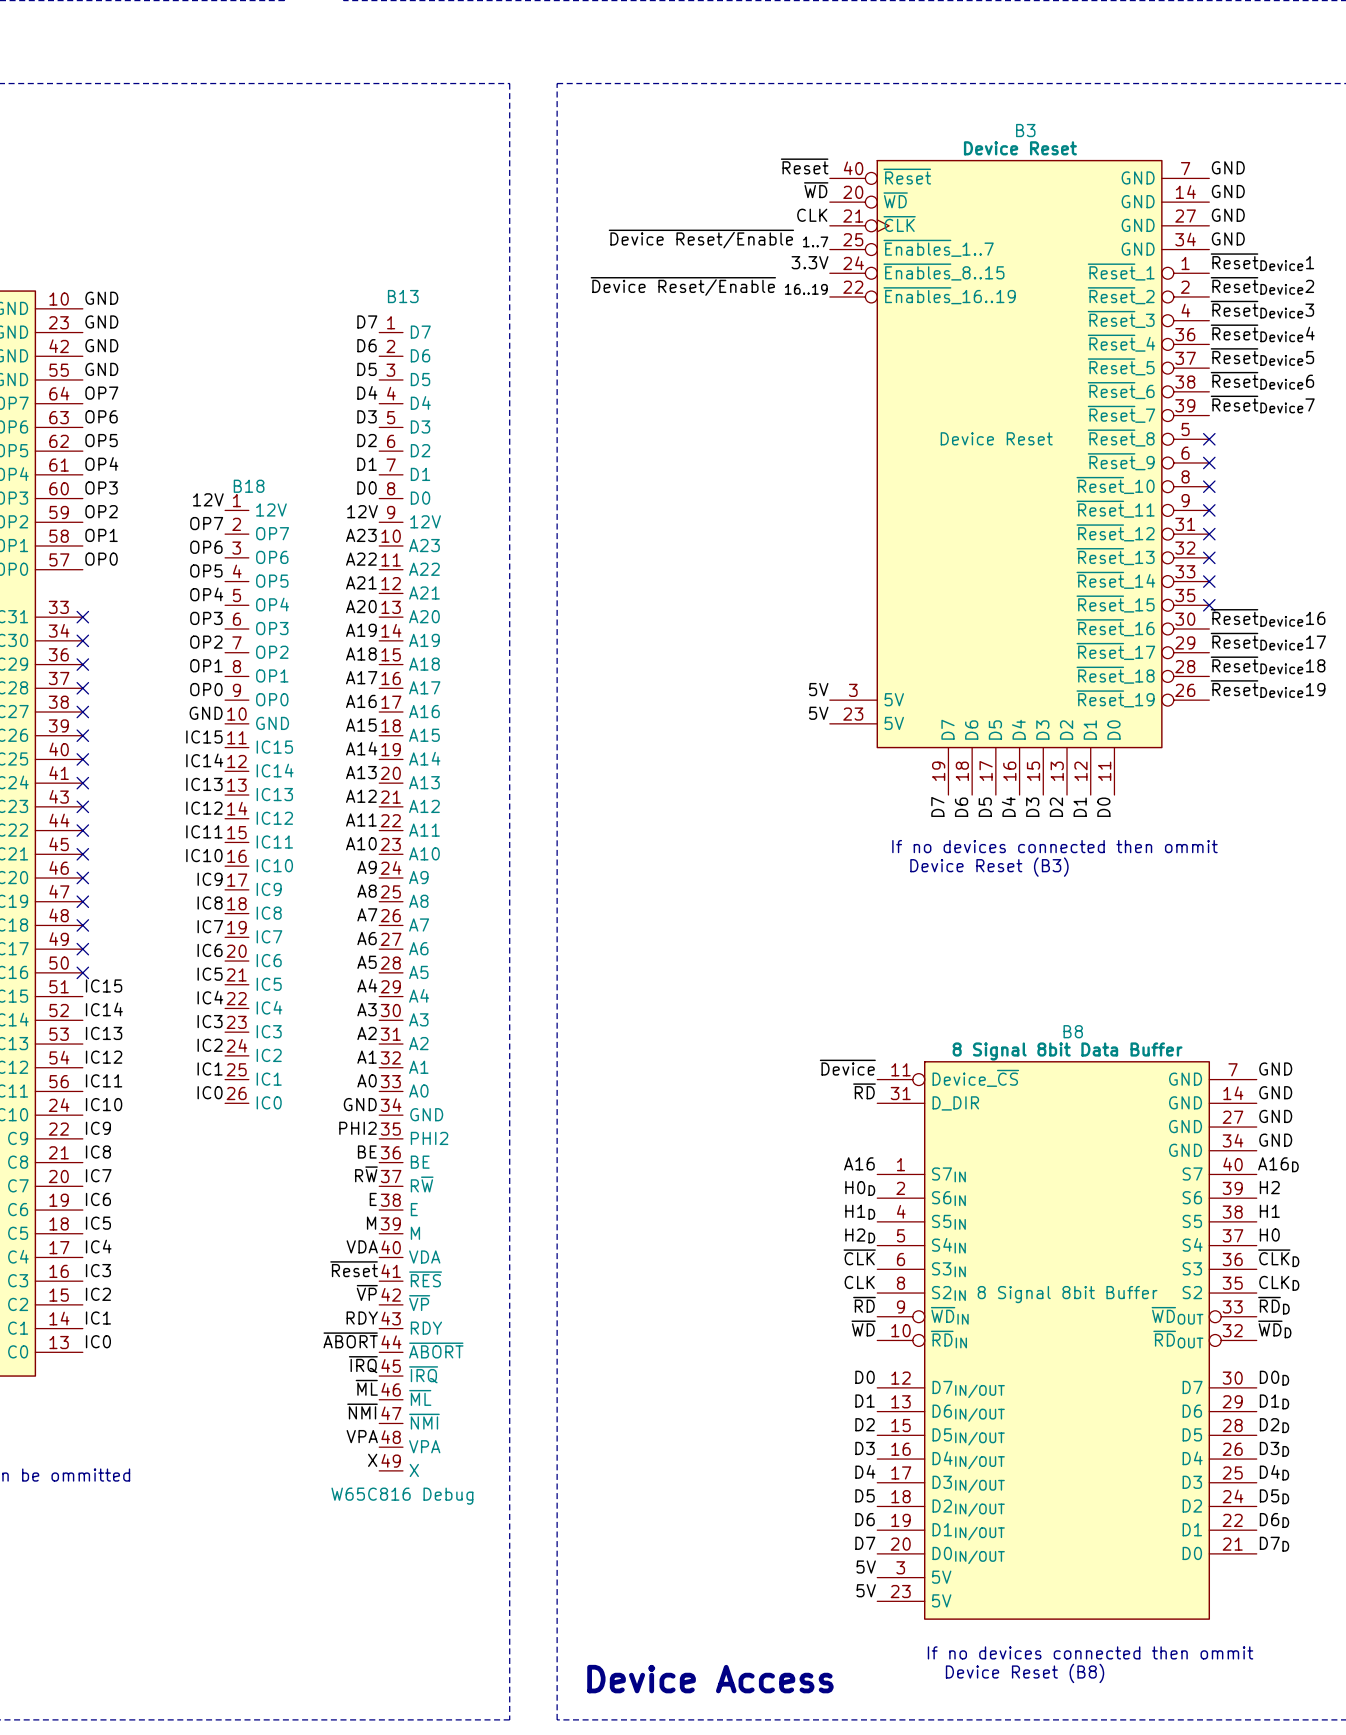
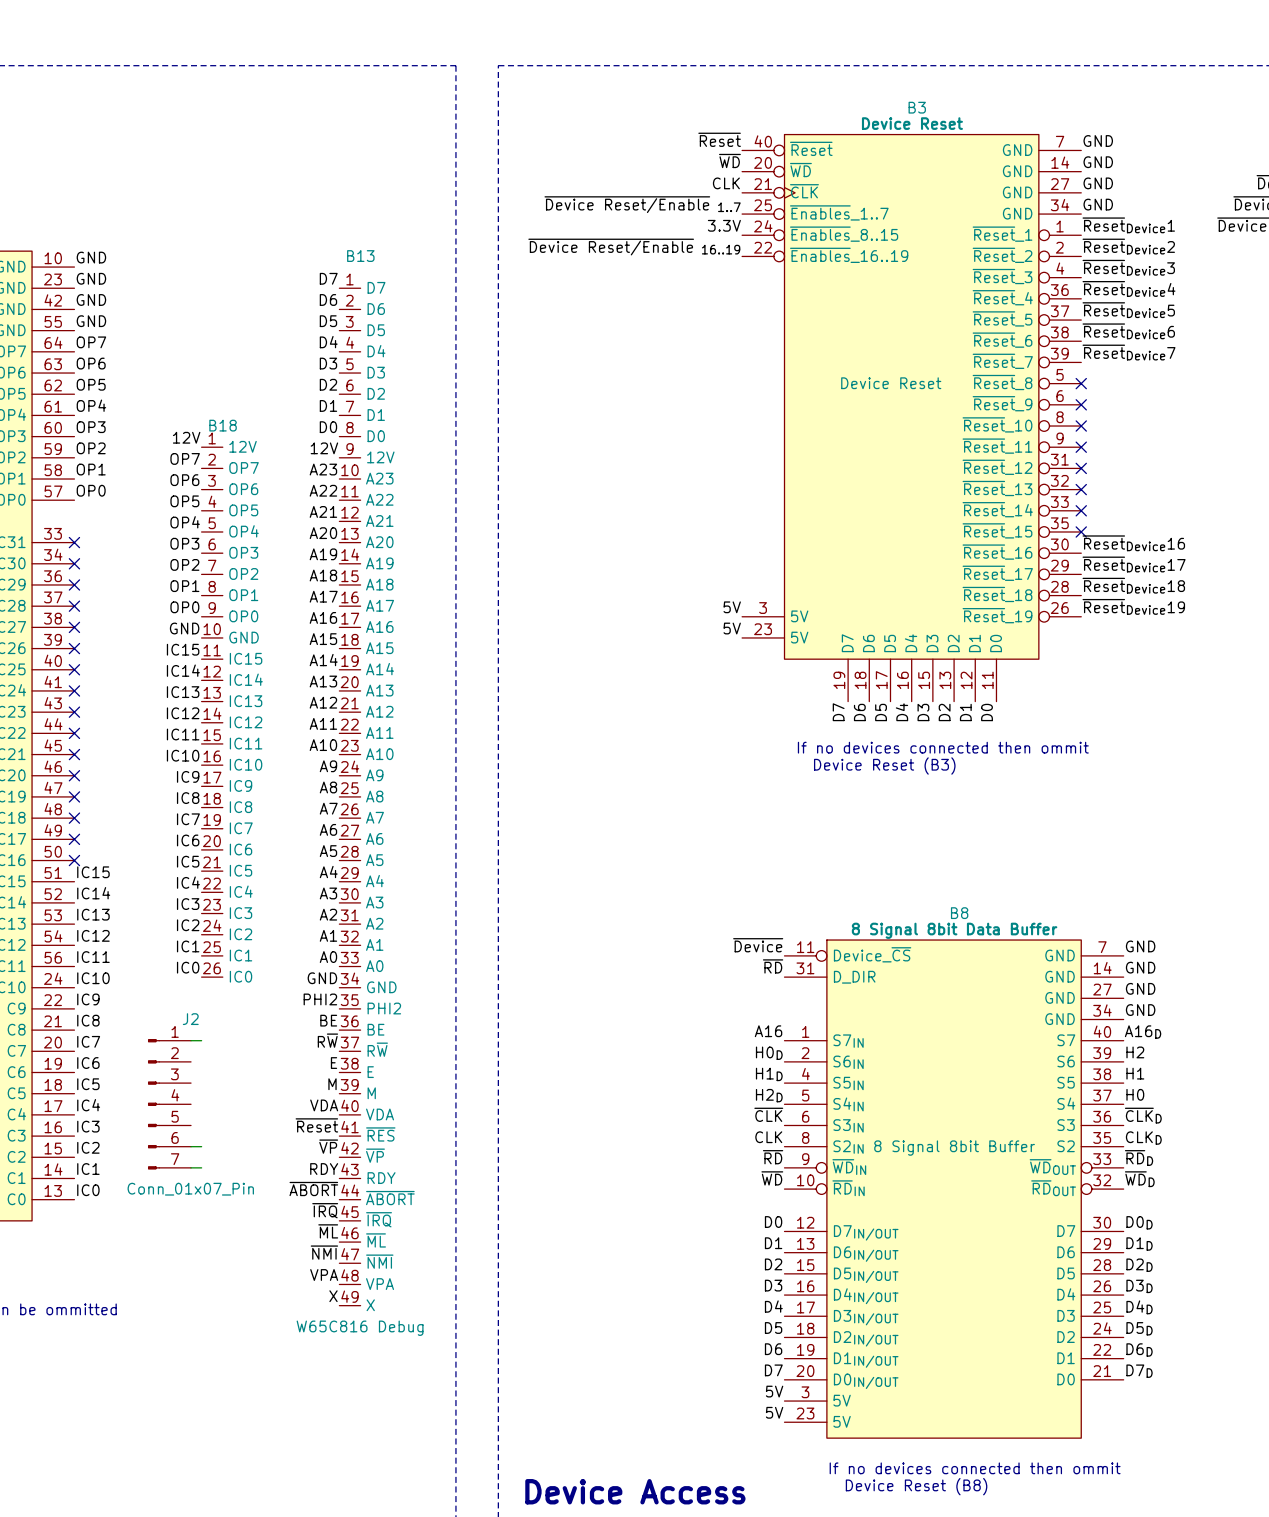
wire: none -> (191, 1040) (201, 1040)
J2: none -> Conn_01x07_Pin (169, 1104)
wire: none -> (191, 1146) (201, 1146)
wire: none -> (191, 1167) (201, 1167)

